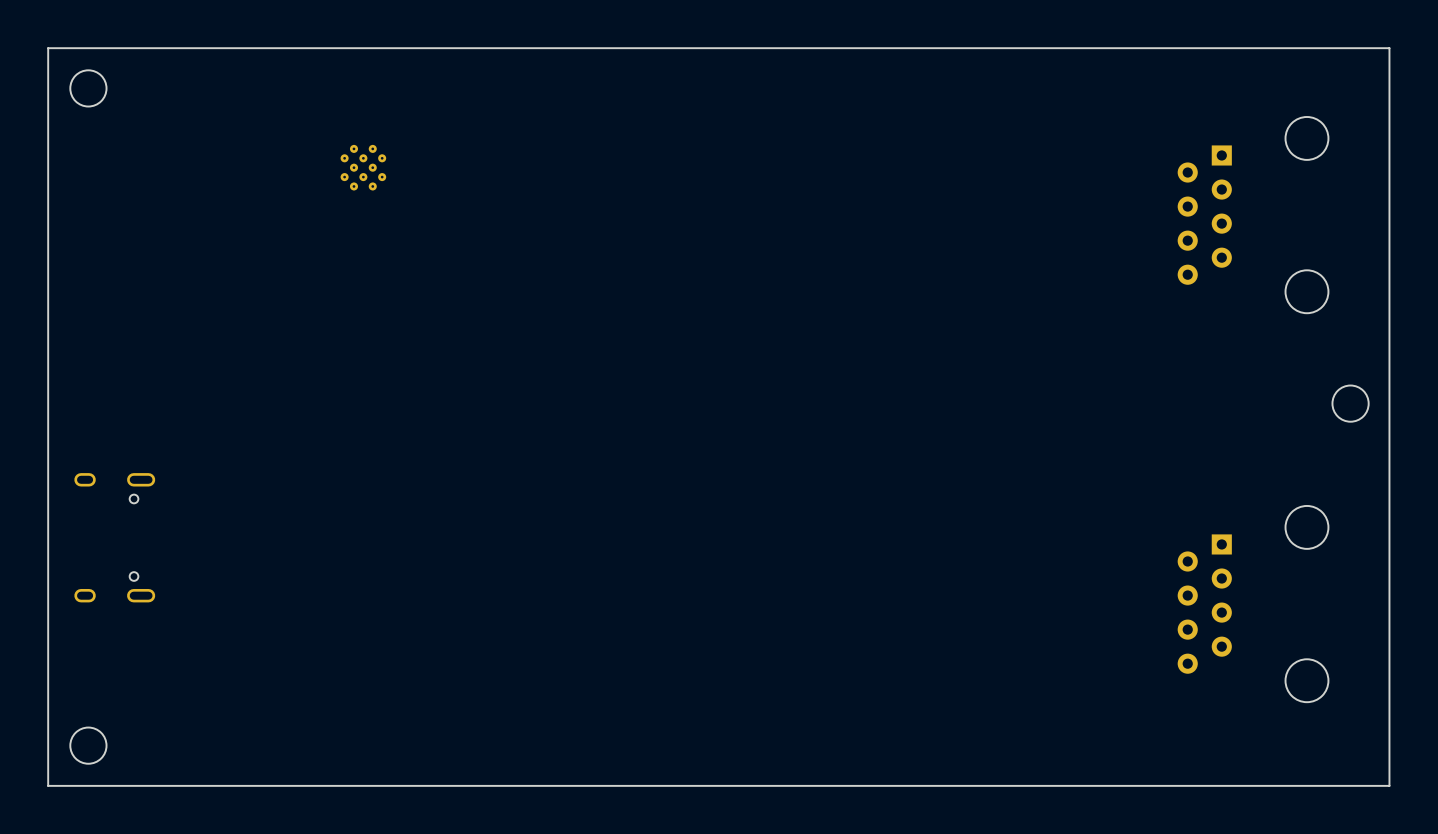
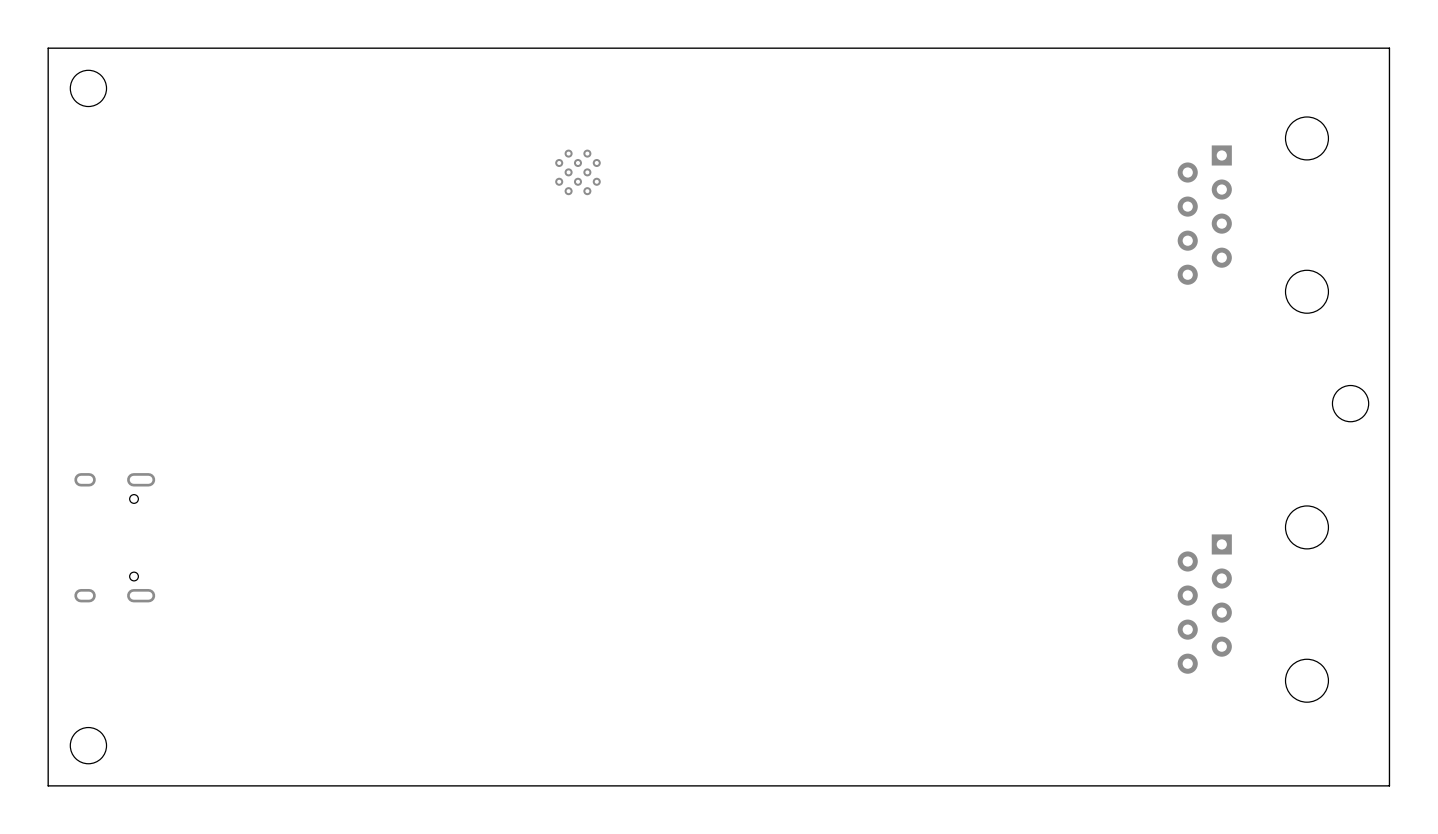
part: (363, 167) -> none
part: none -> (577, 172)

